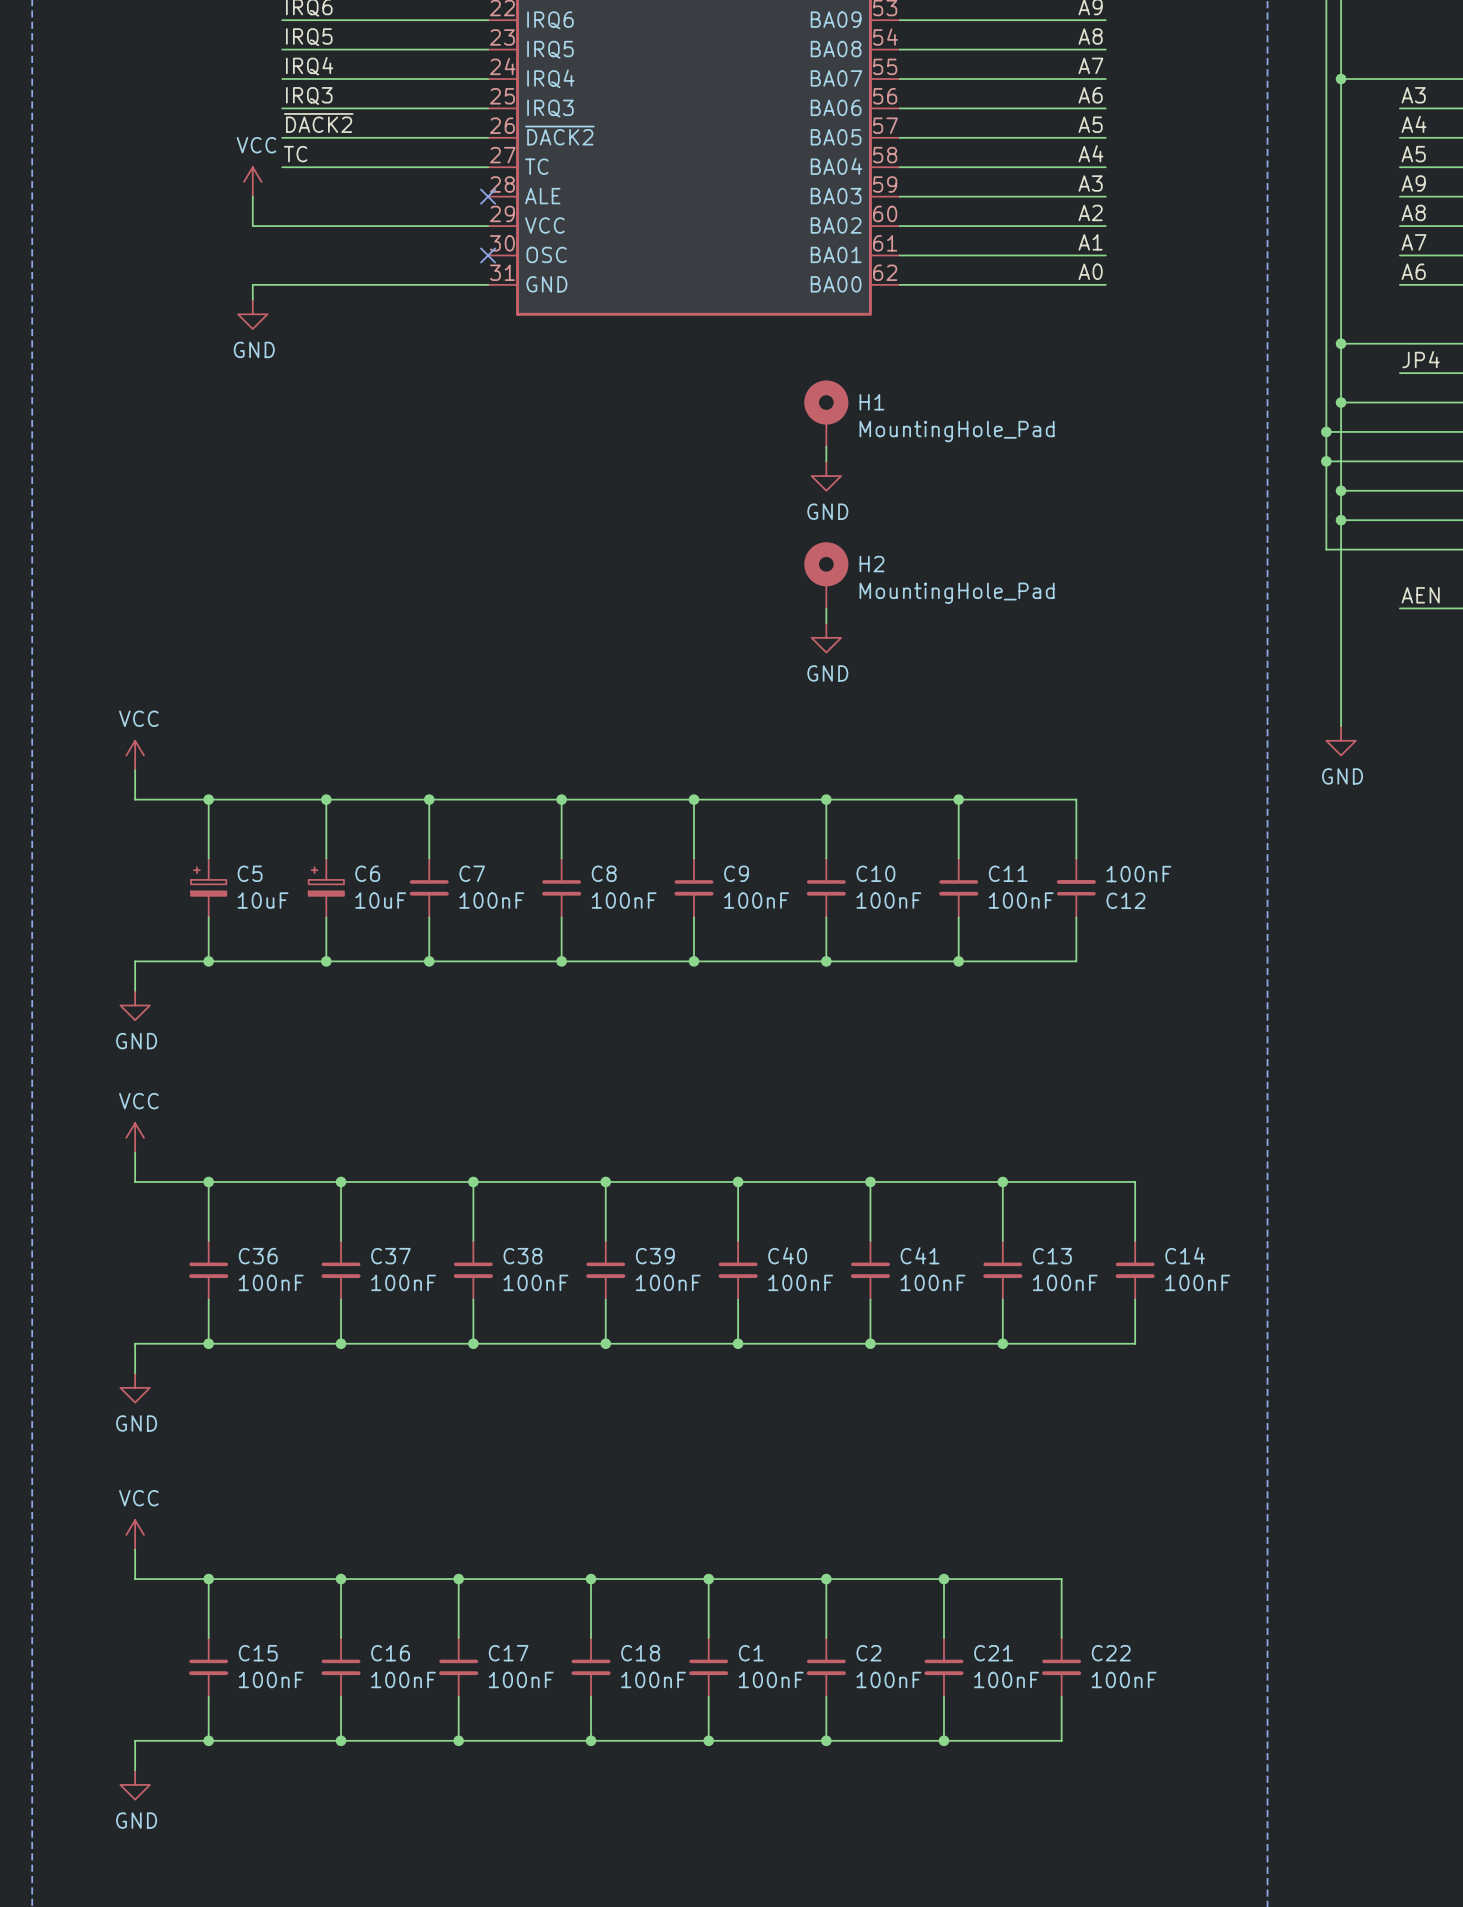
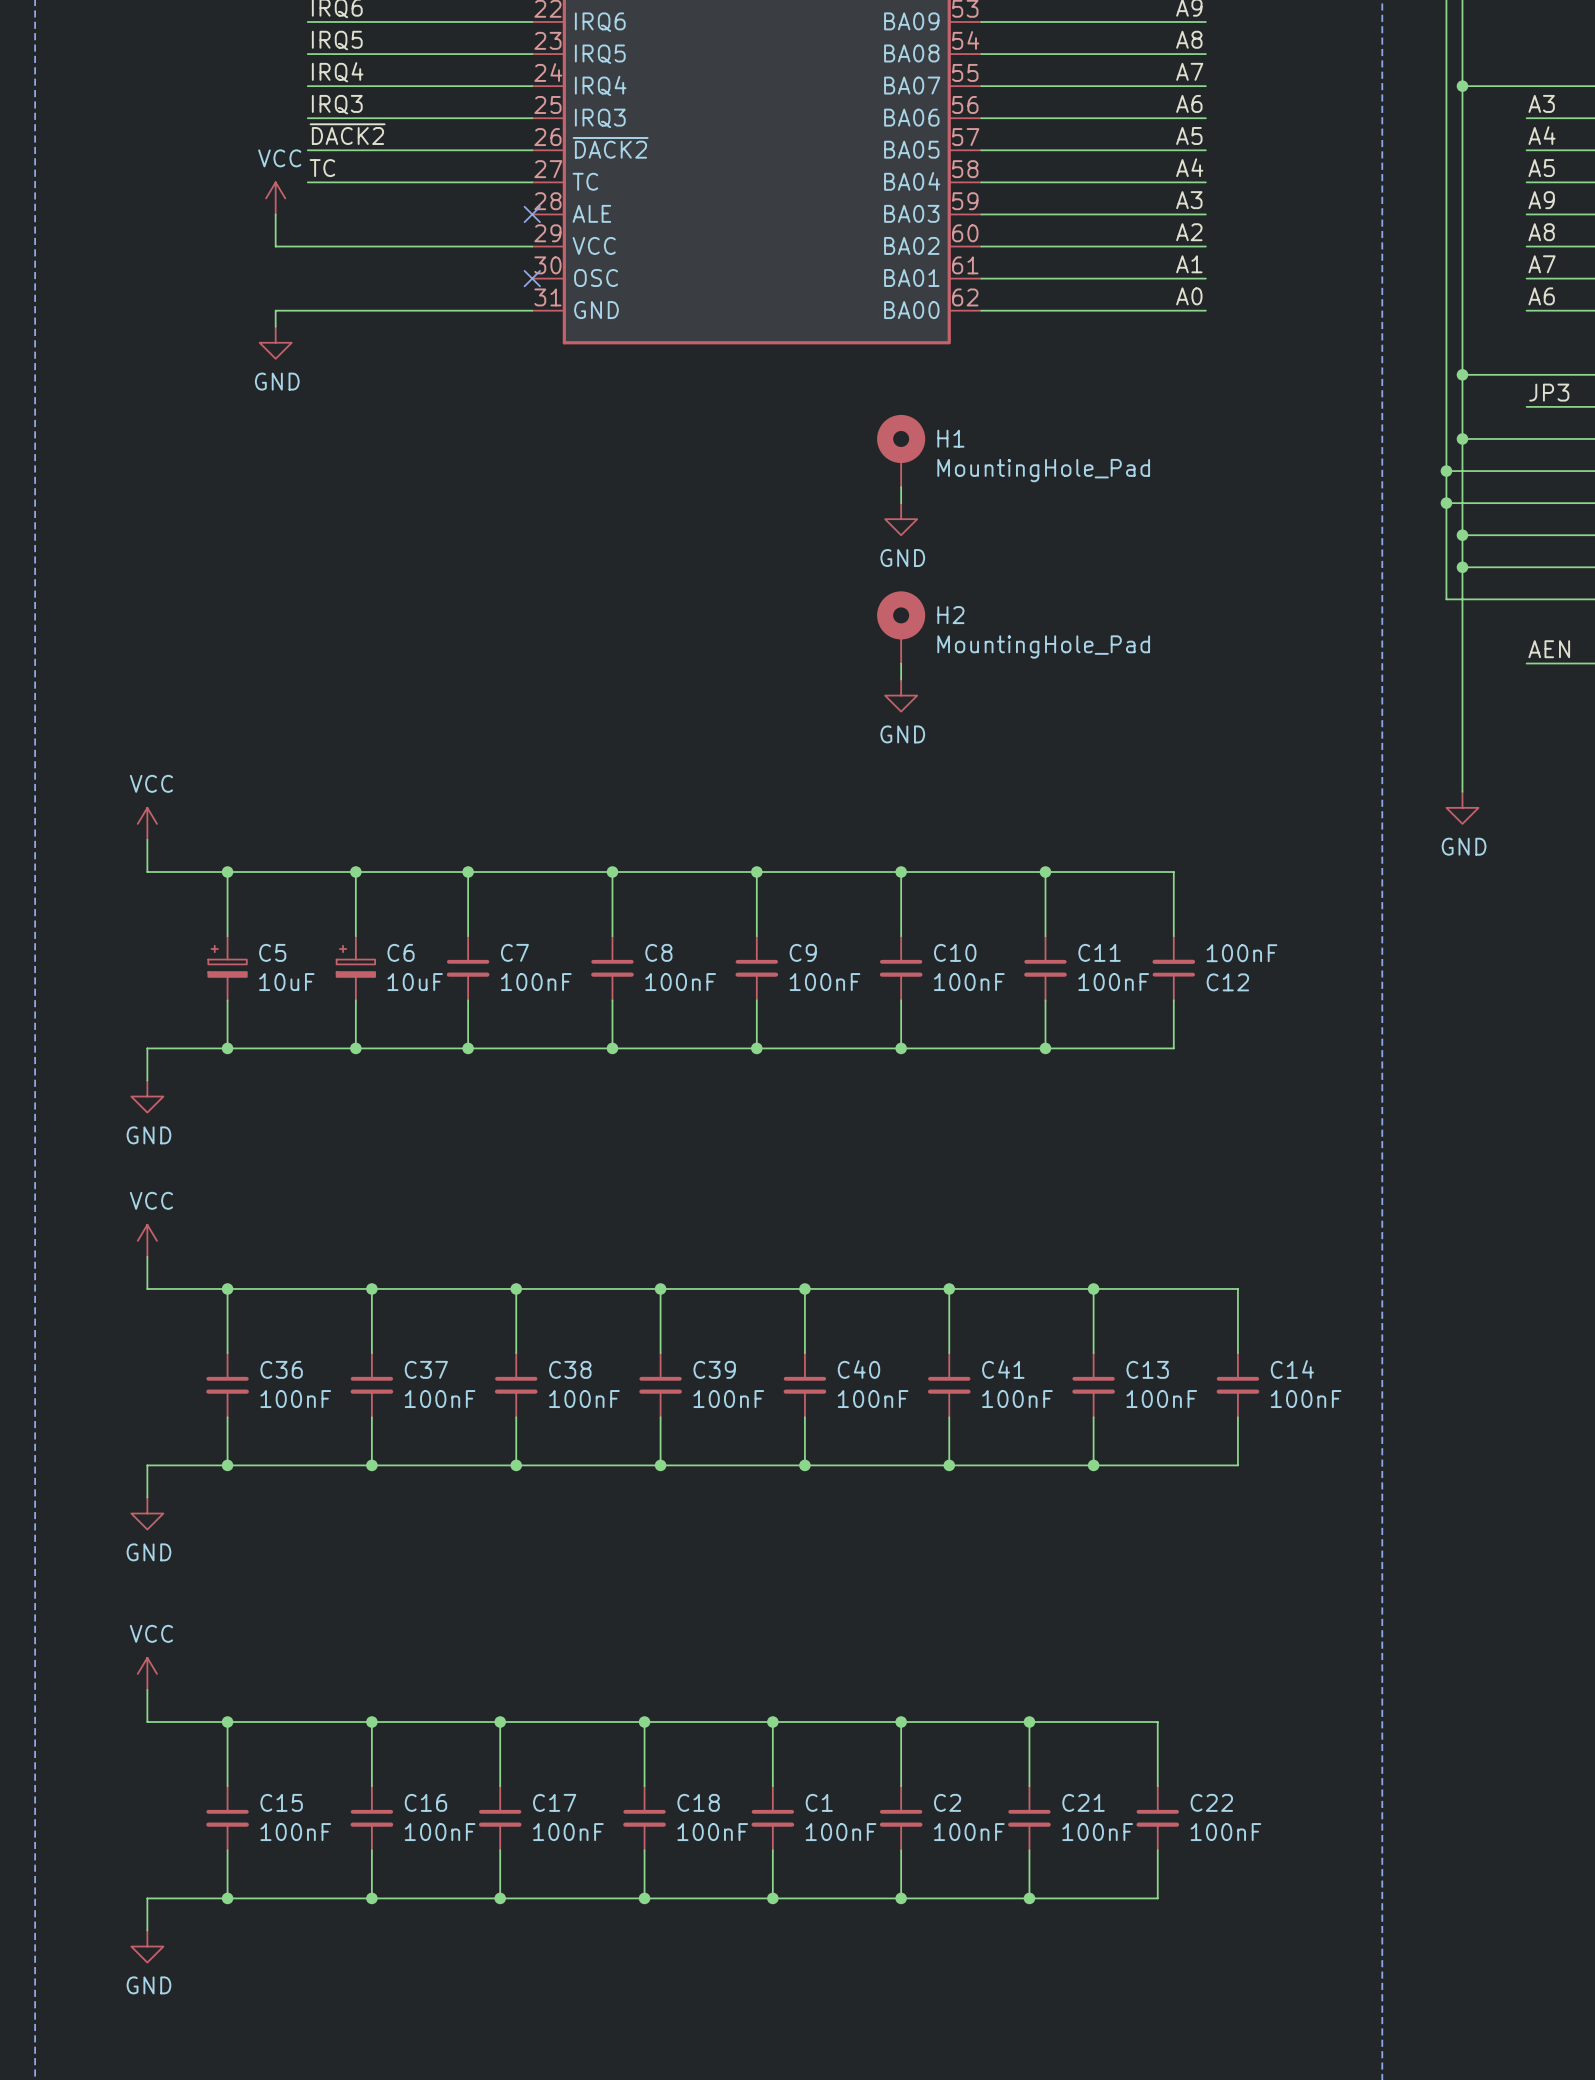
label: JP4 (1421, 359) -> JP3 (1549, 392)

